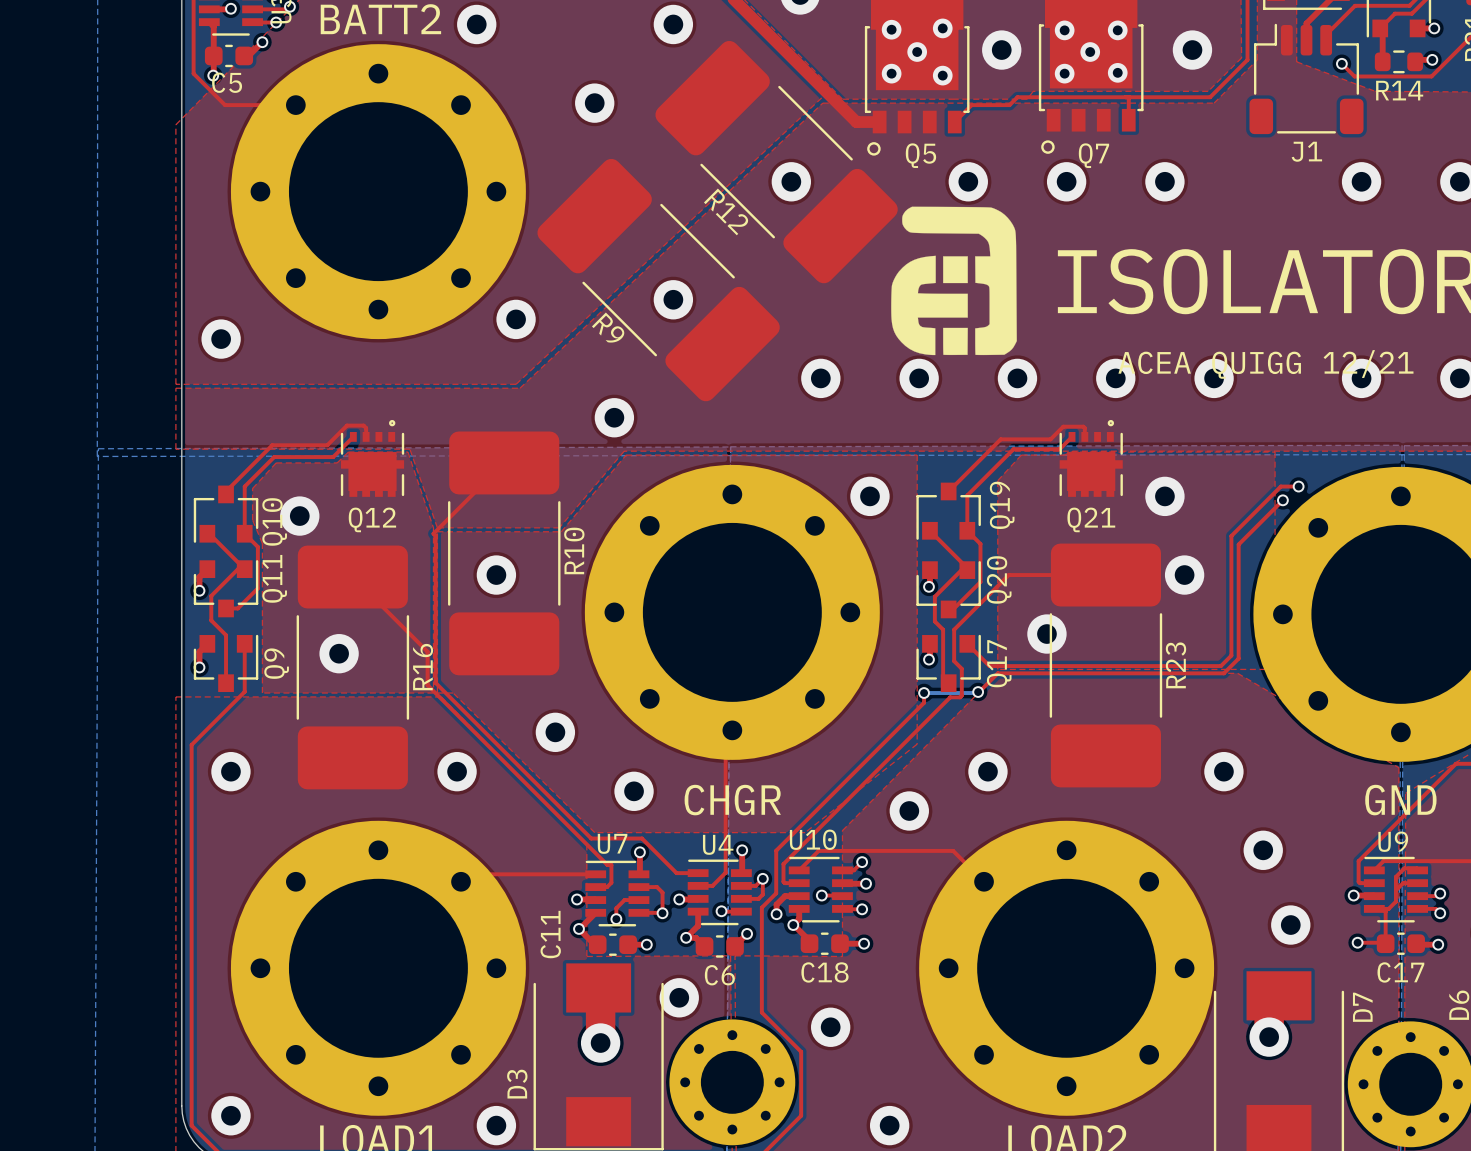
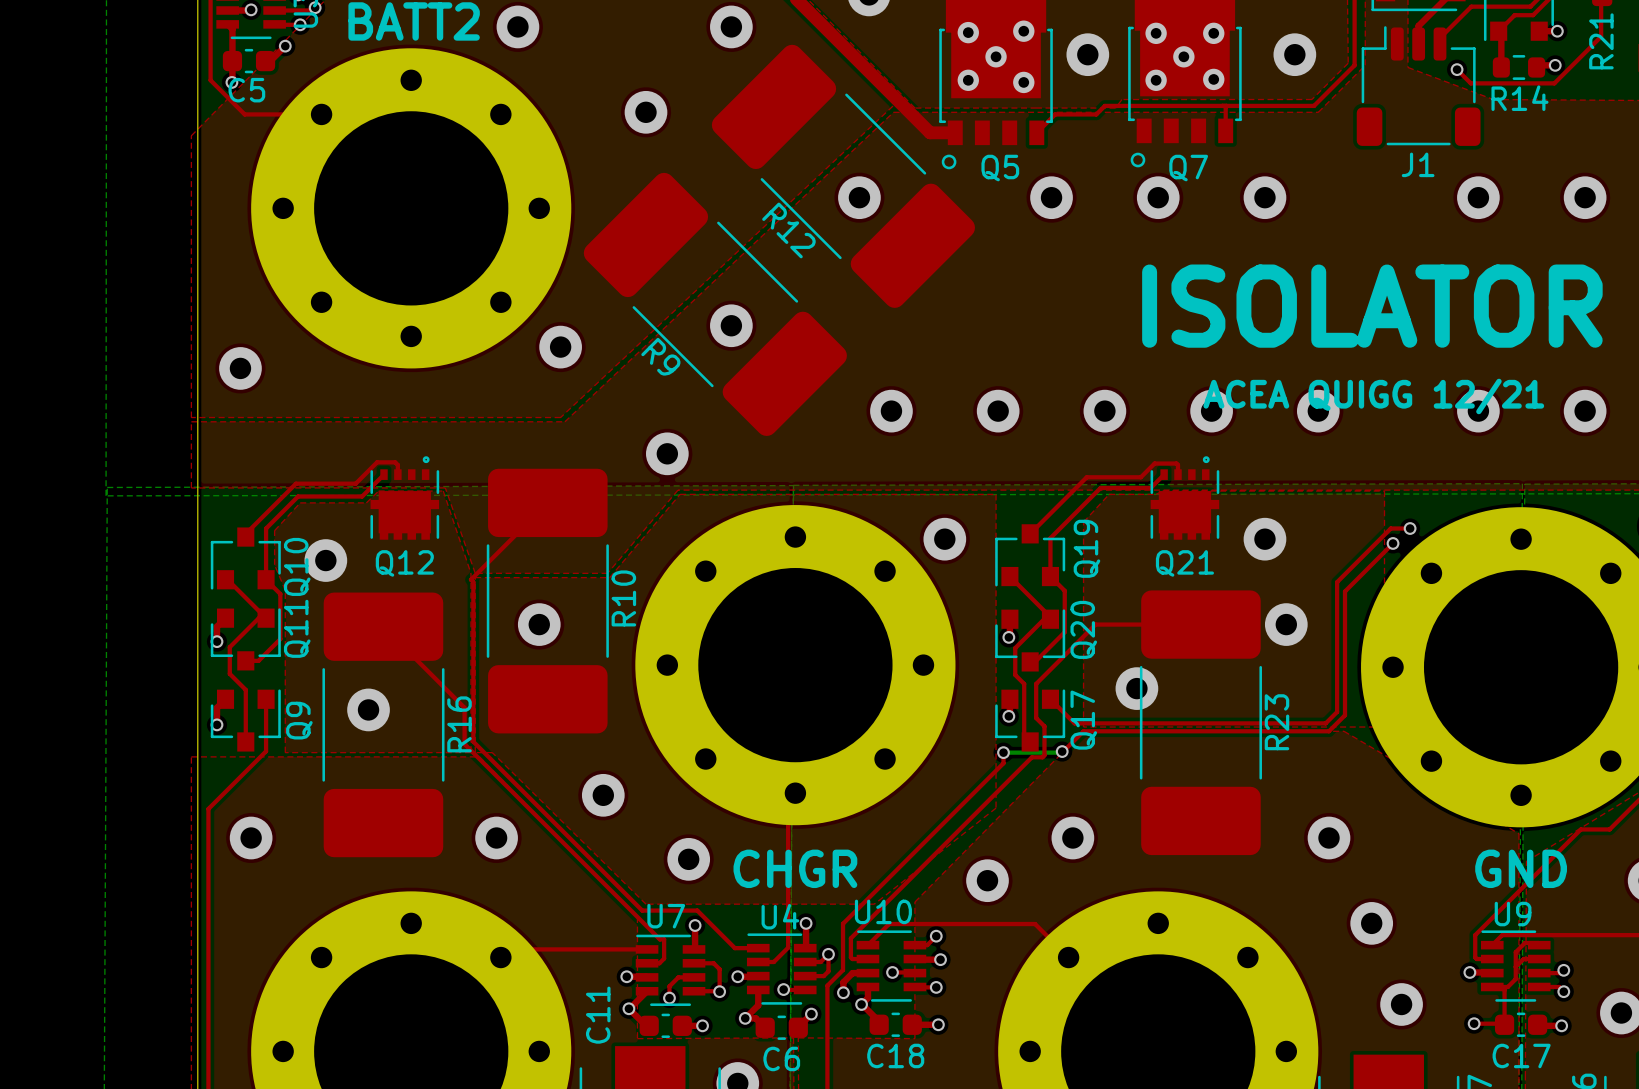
drawing: [891, 206, 1017, 356] -> none

